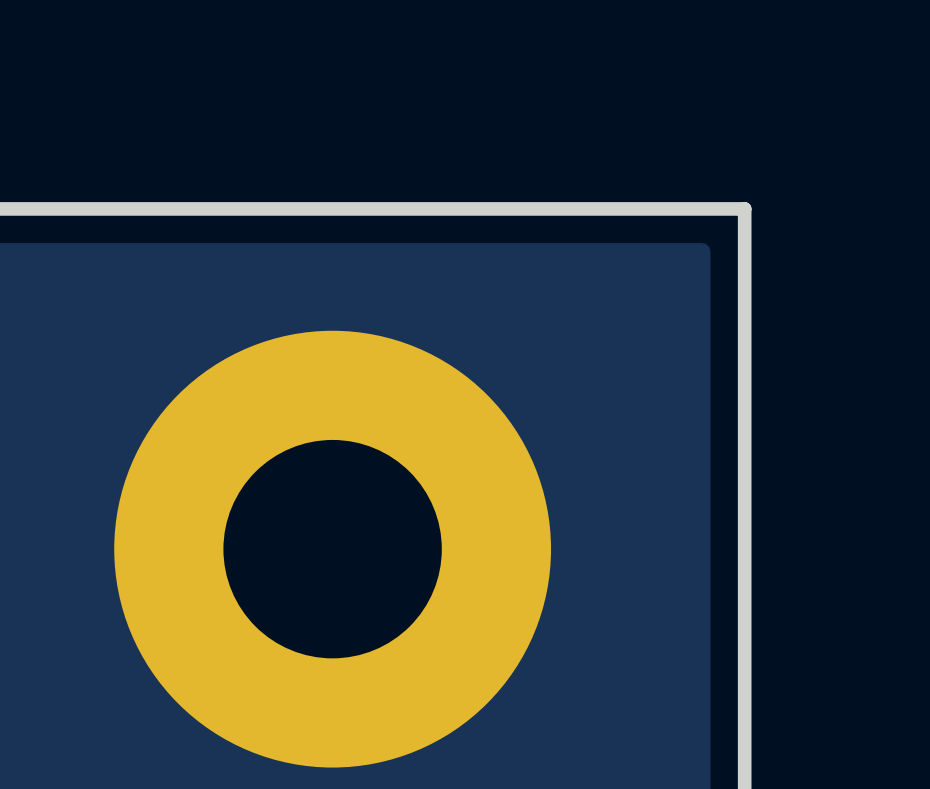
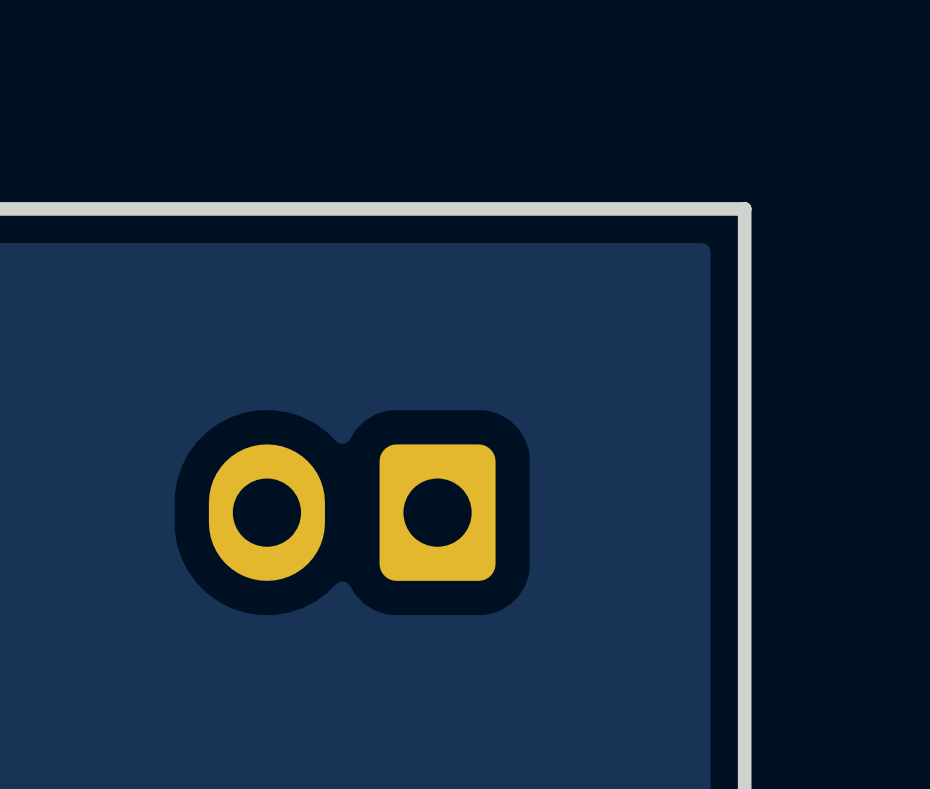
part footprint: [114, 330, 552, 768] -> [208, 444, 496, 581]

